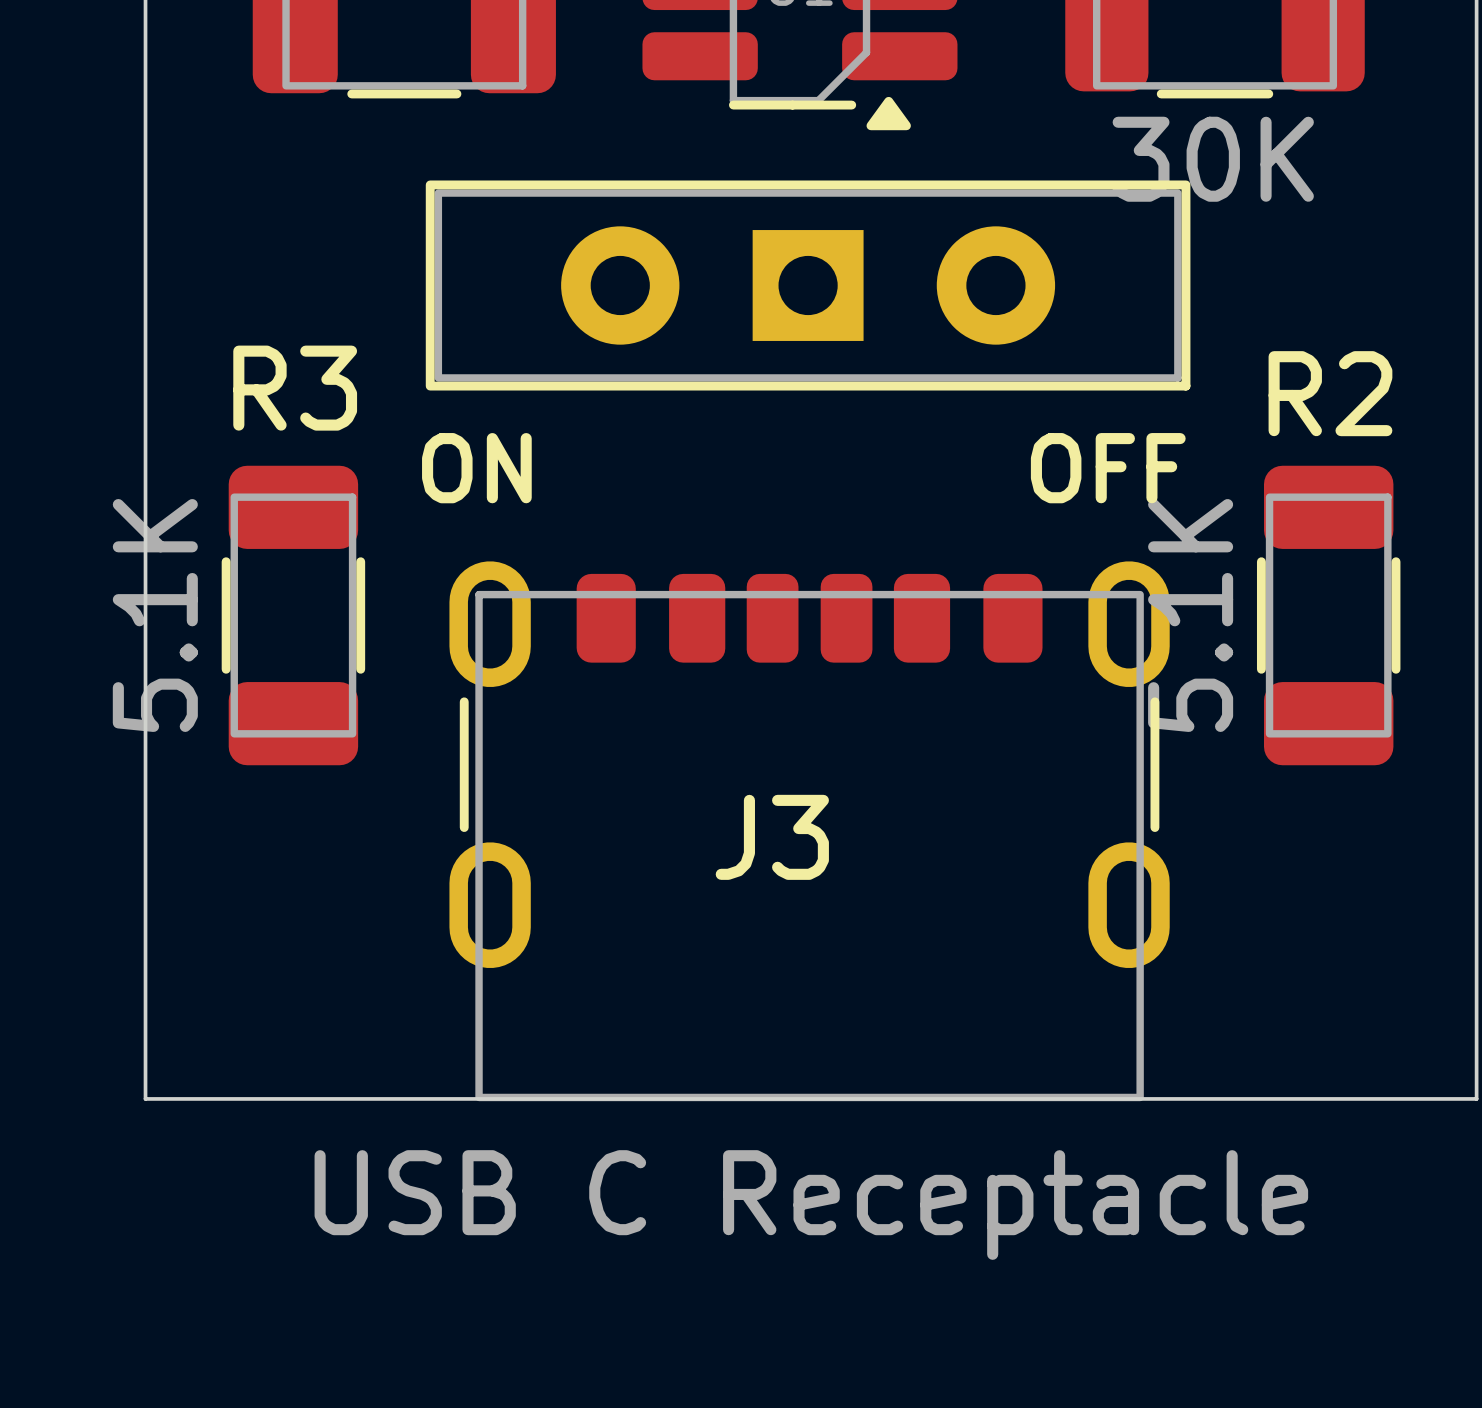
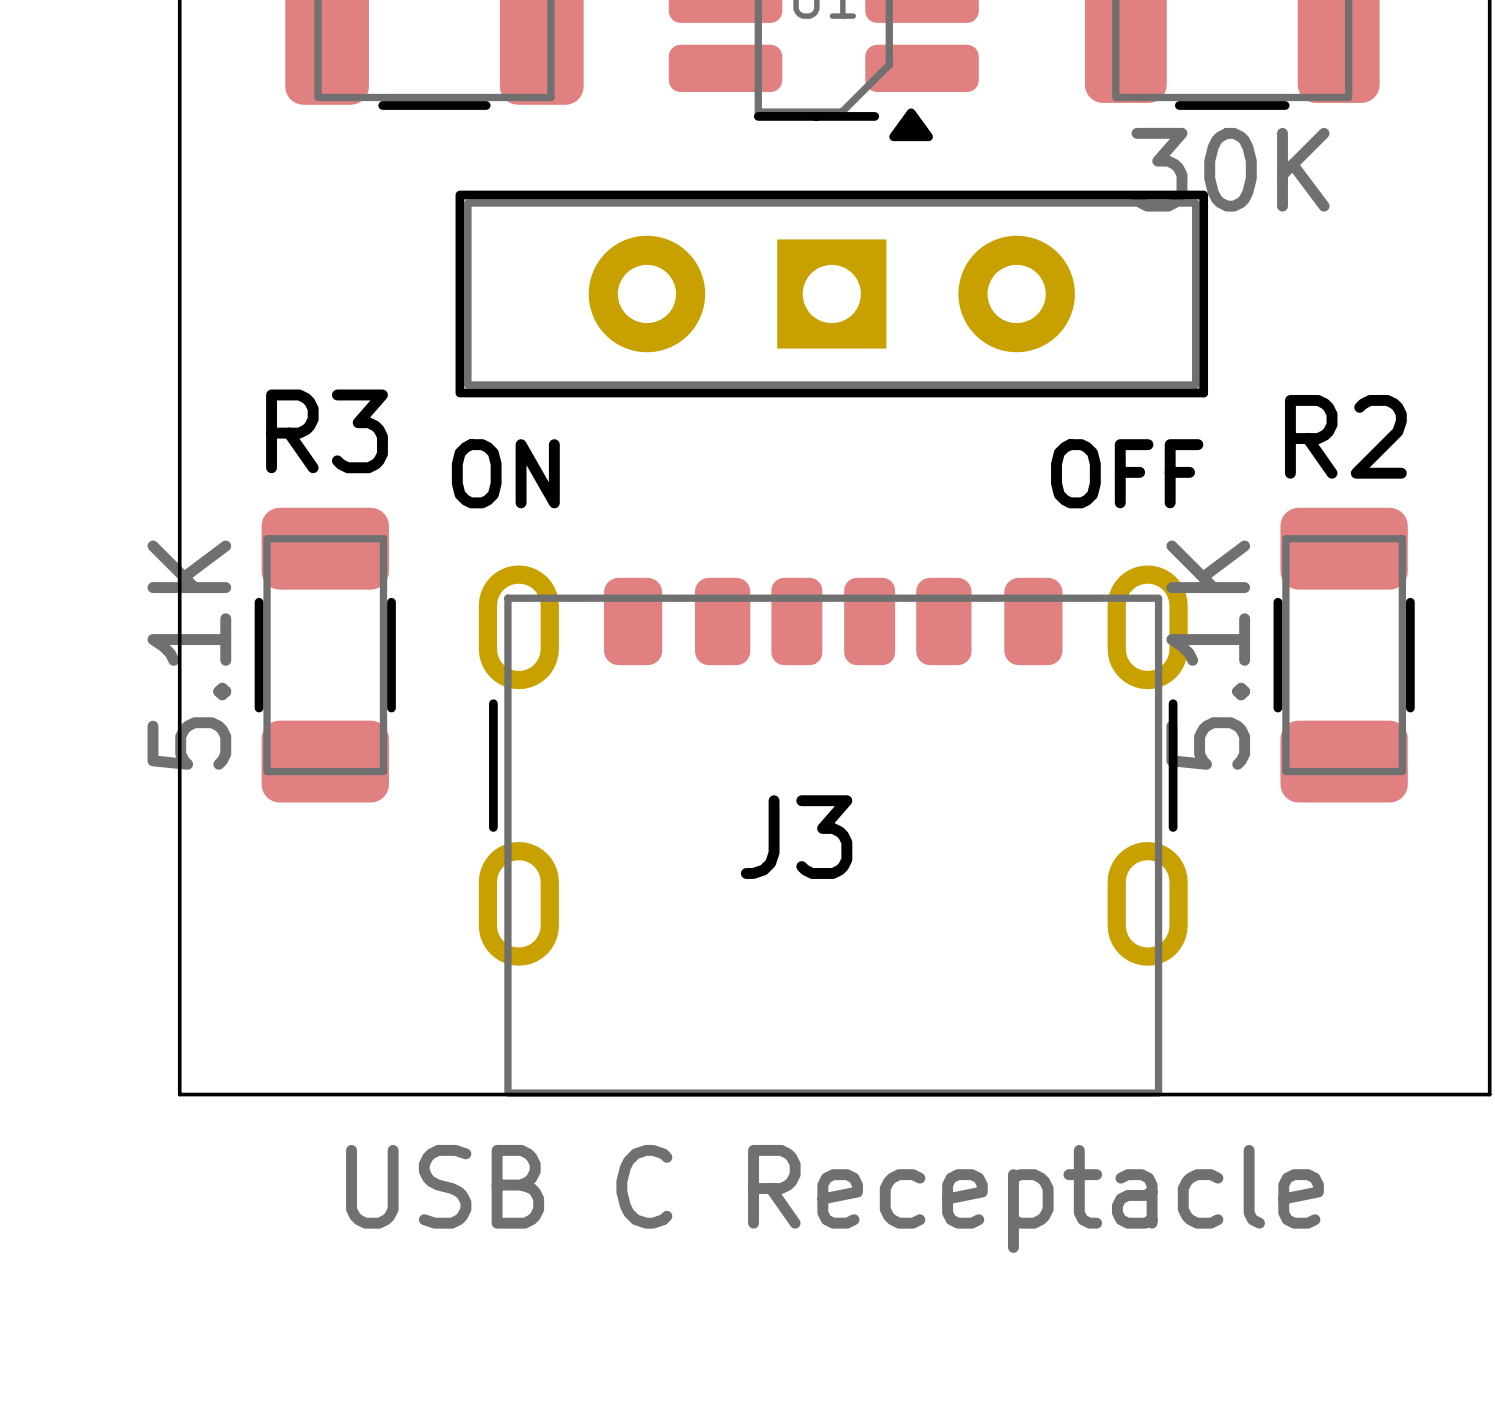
R3 position: (293, 615) -> (325, 655)
R2 position: (1328, 615) -> (1344, 655)

